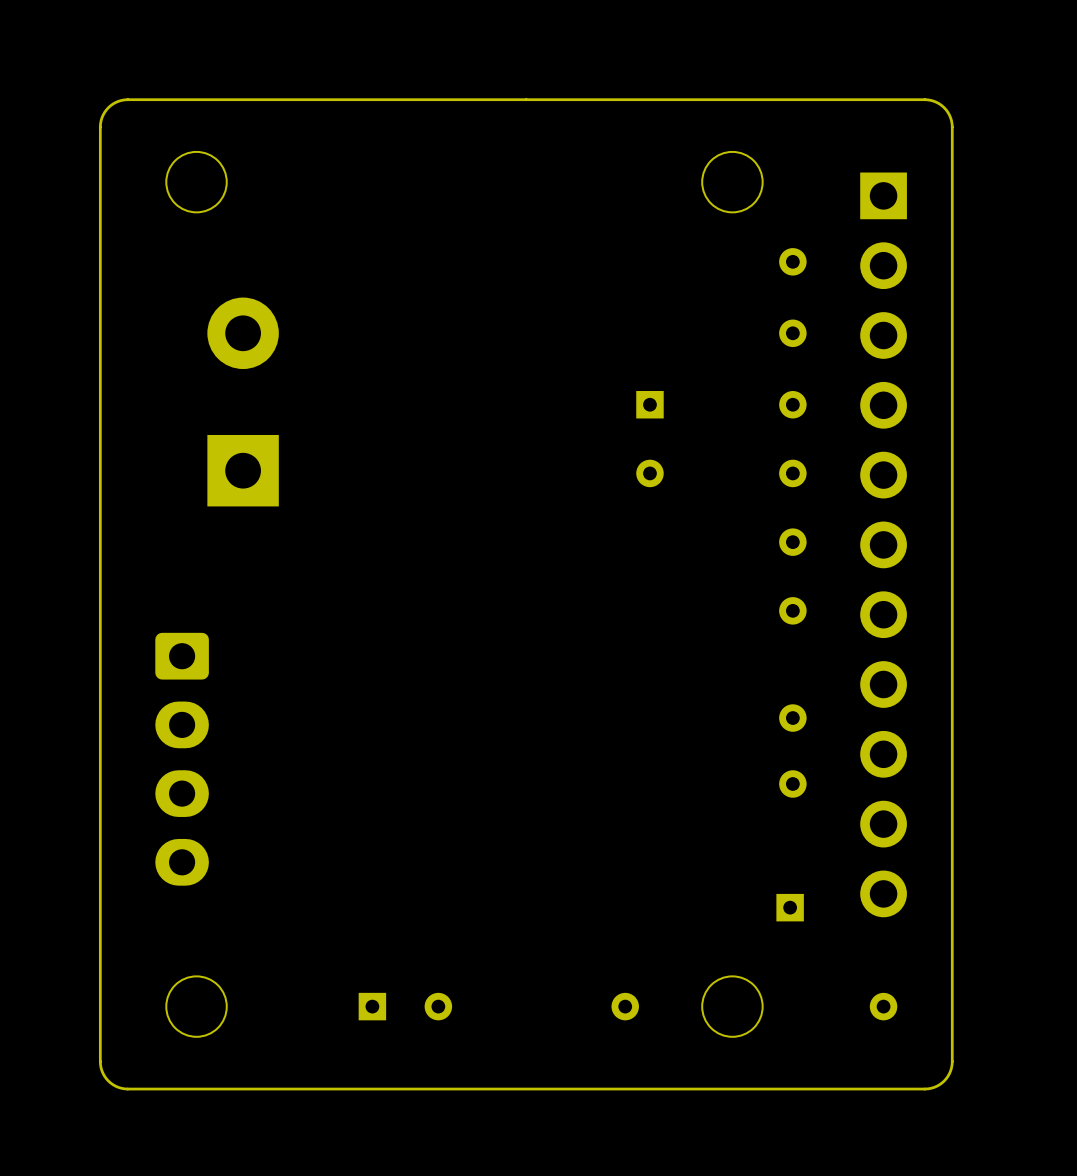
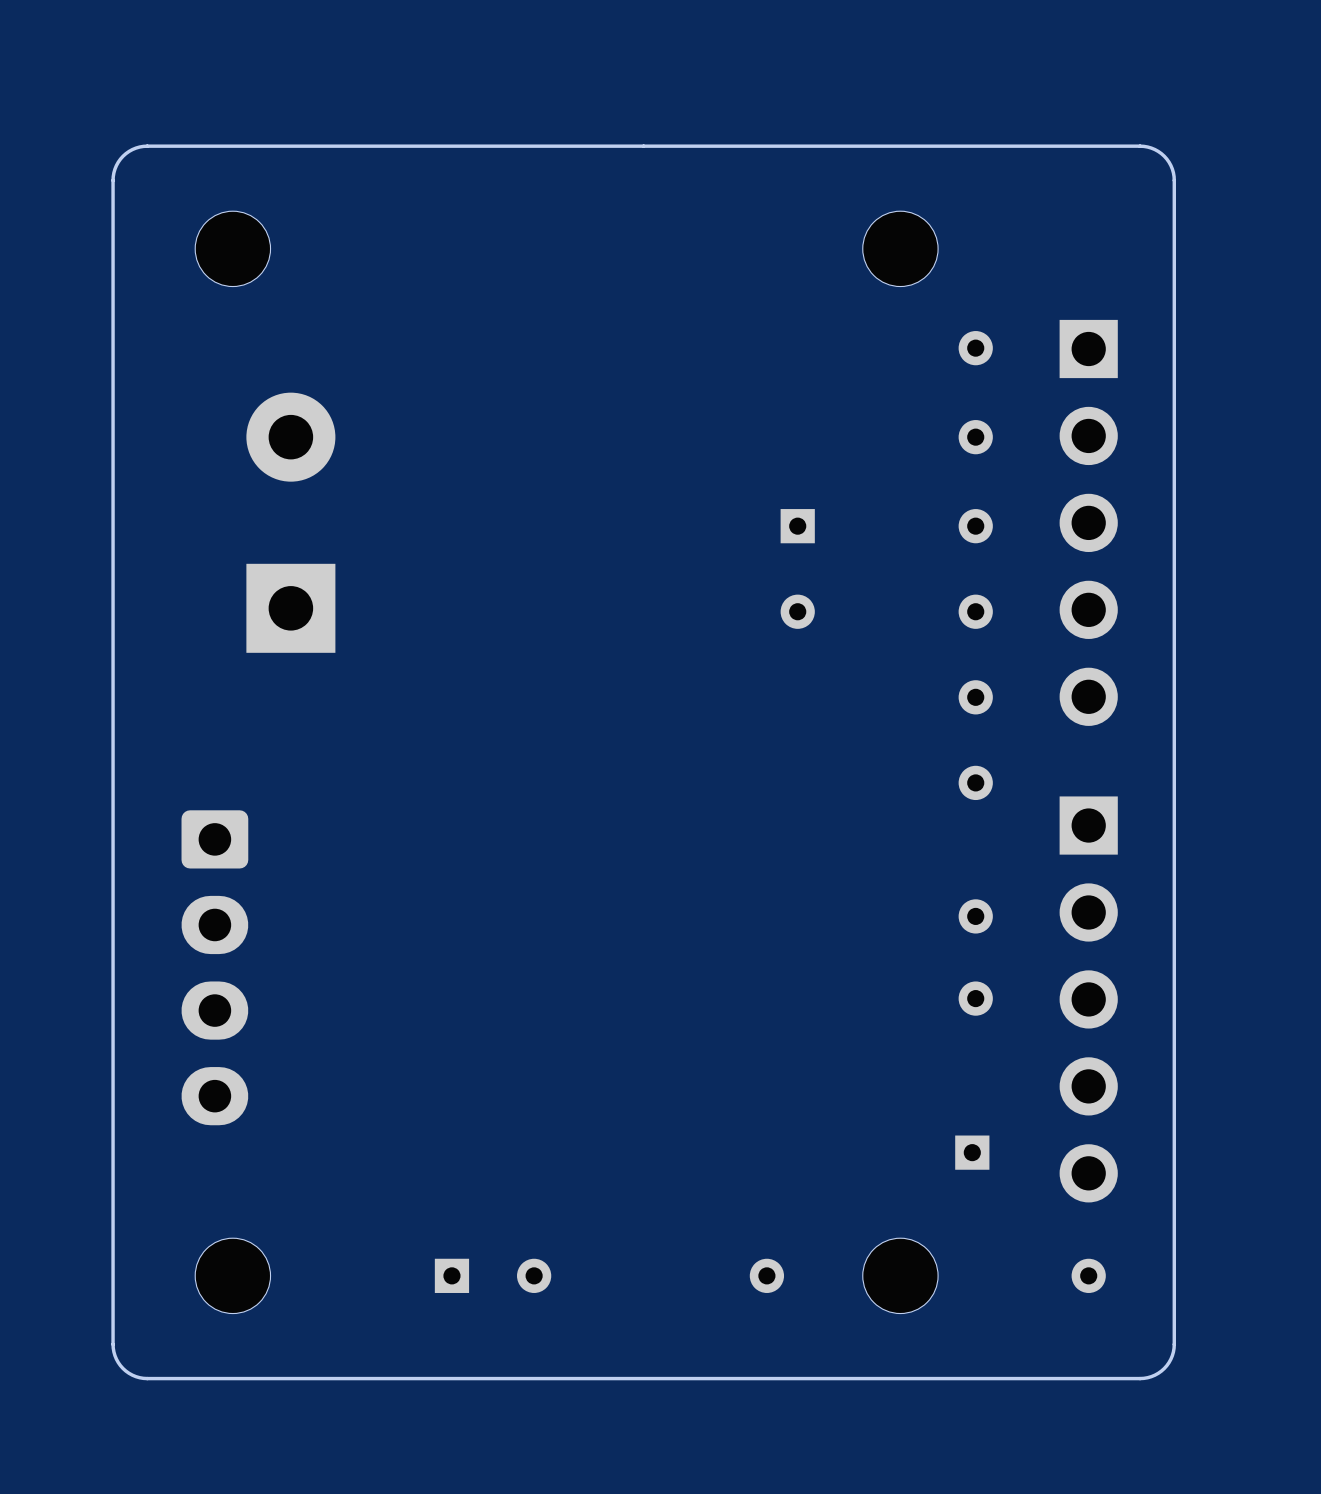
part: none -> (1088, 522)
part: (883, 544) -> none
part: none -> (1088, 999)

